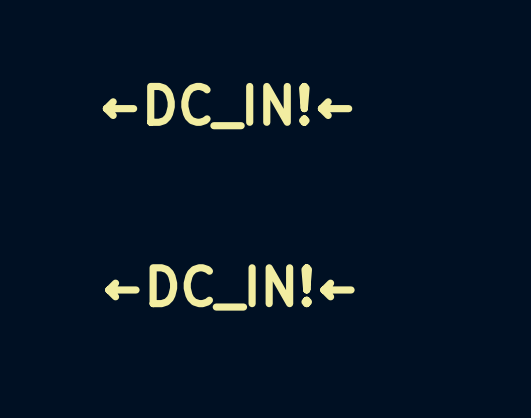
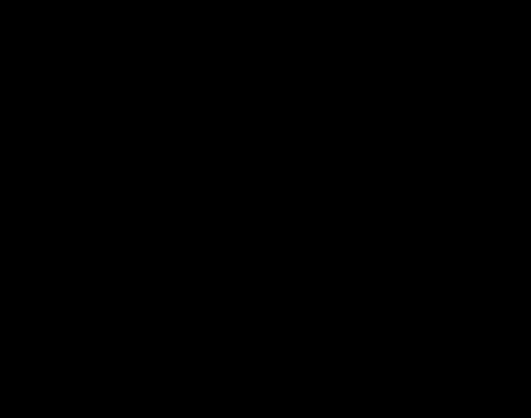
text: ←DC_IN!← (227, 106) -> none
text: ←DC_IN!← (229, 287) -> none

